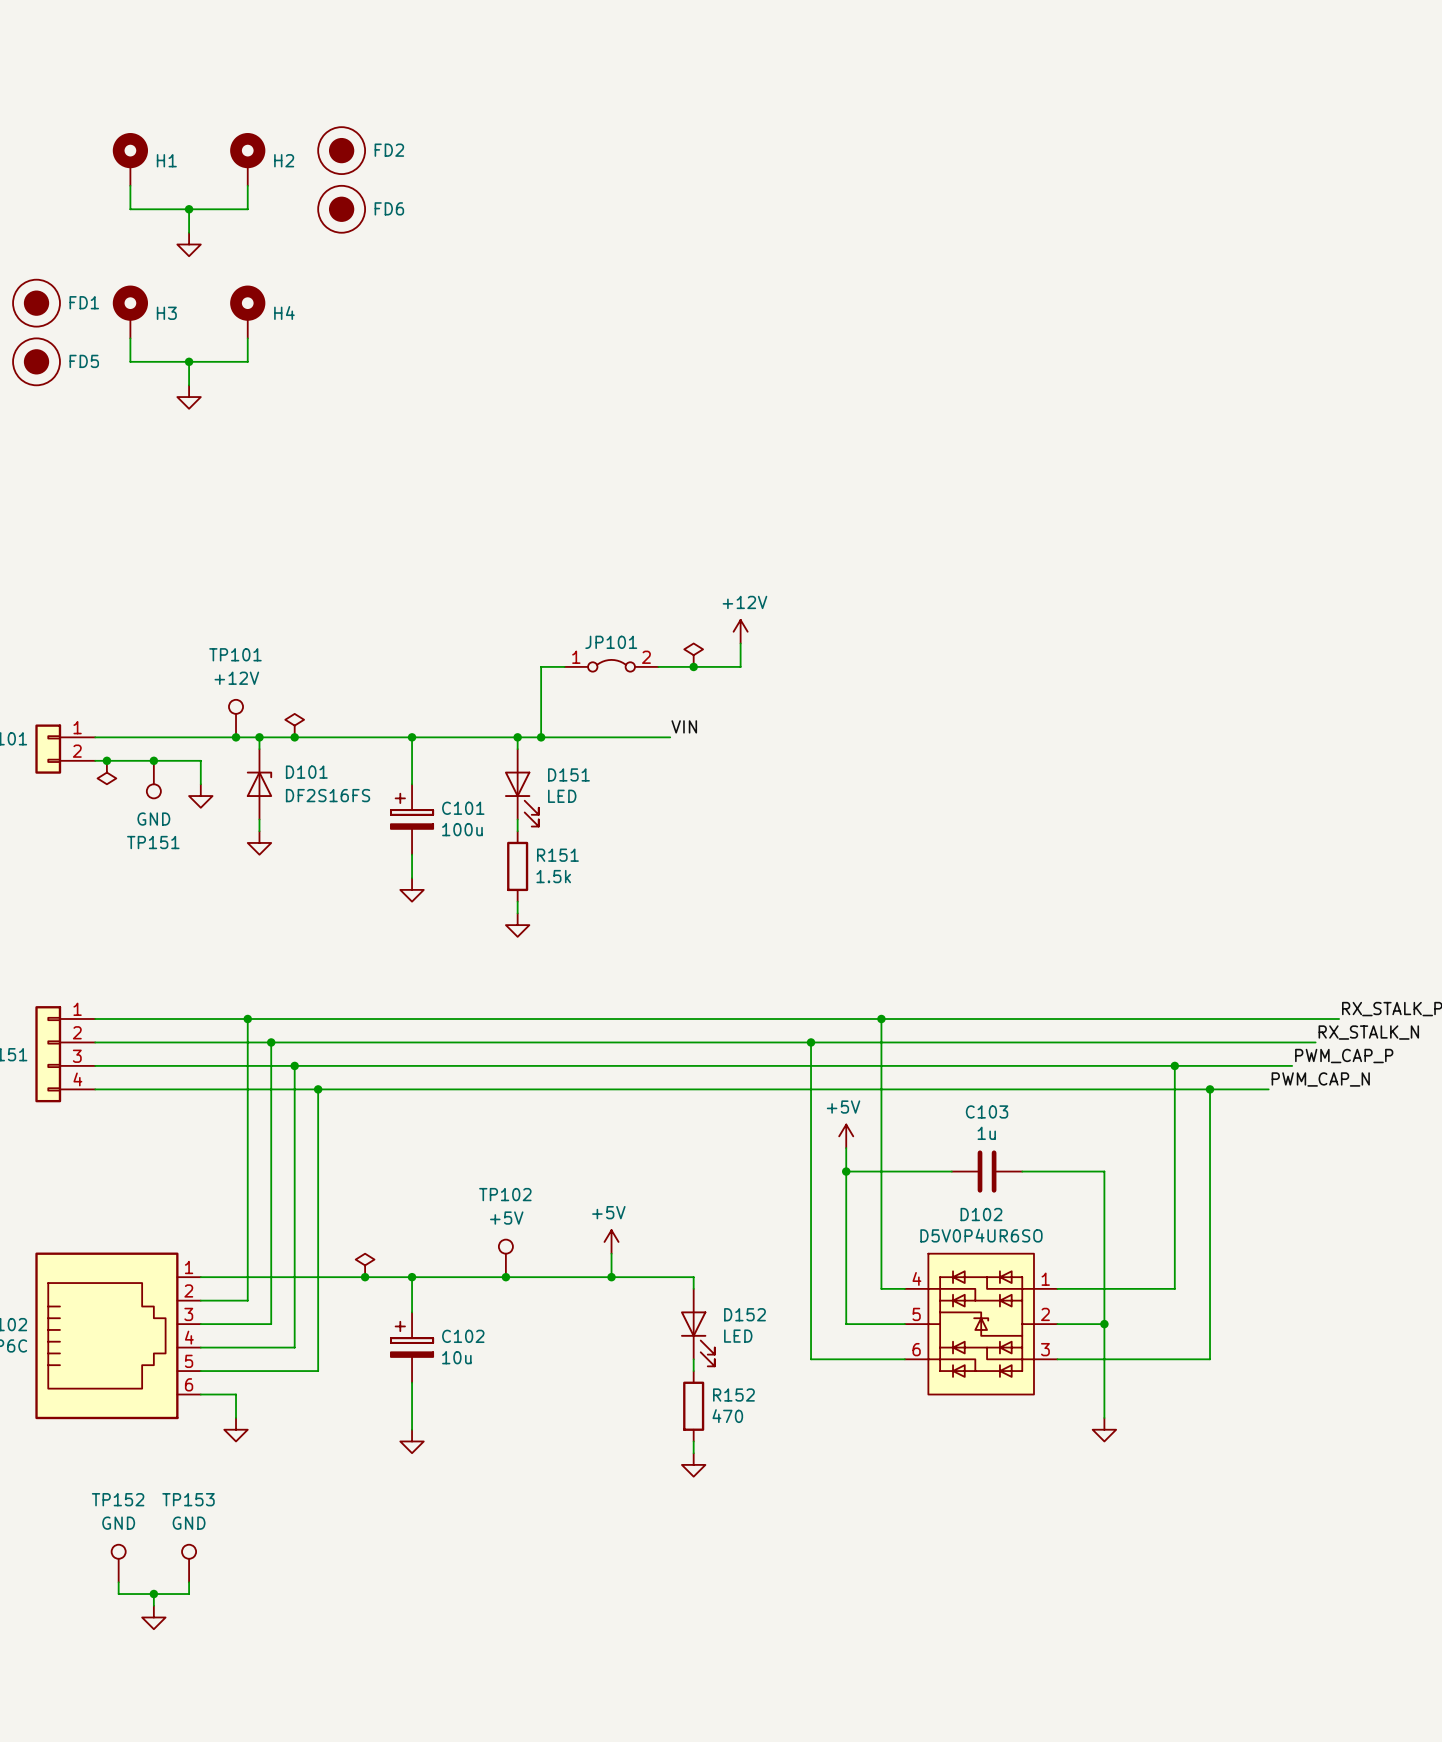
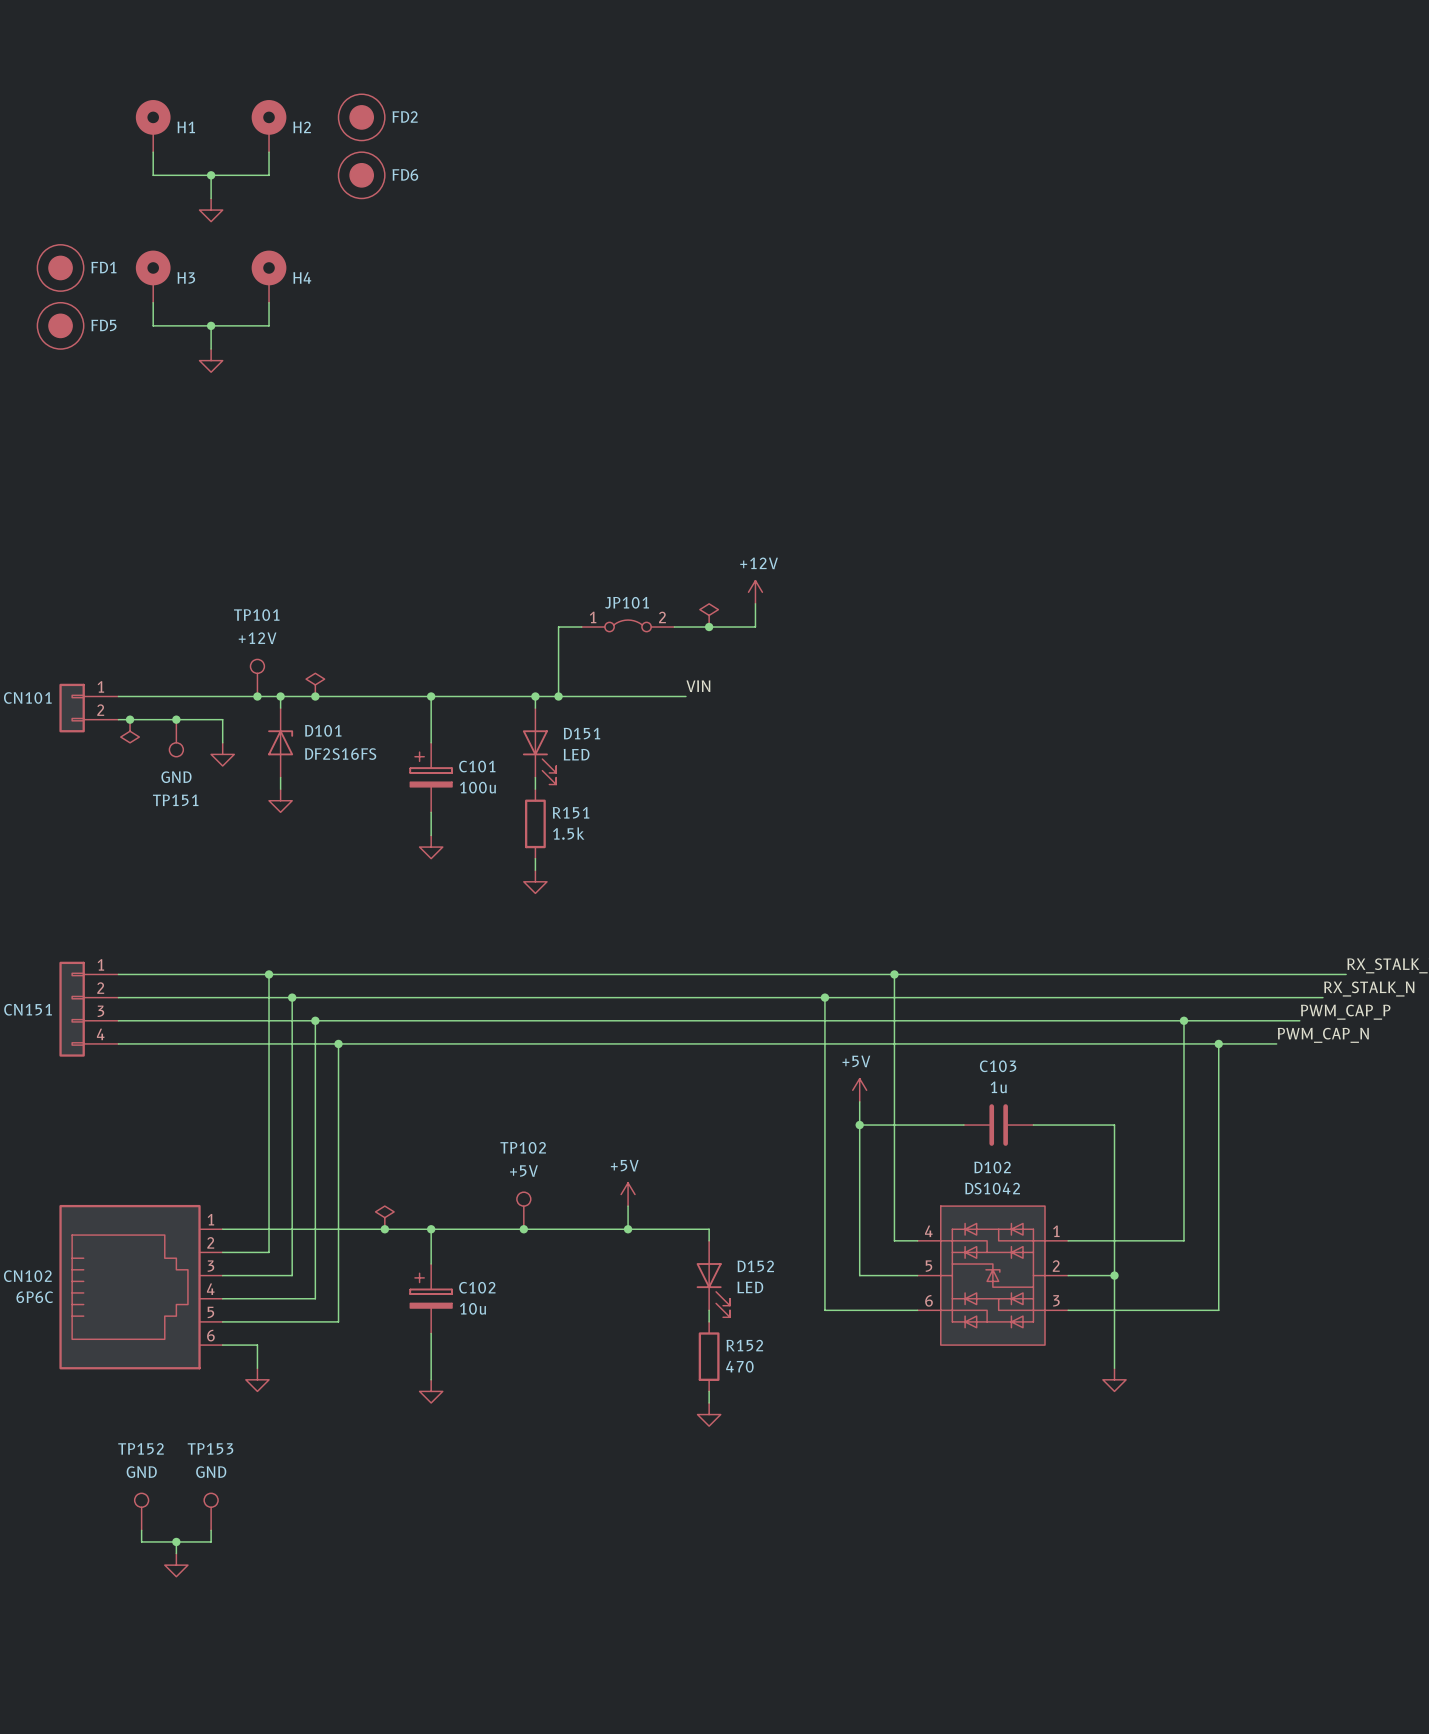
D102 value: D5V0P4UR6SO (981, 1235) -> DS1042 (992, 1188)

